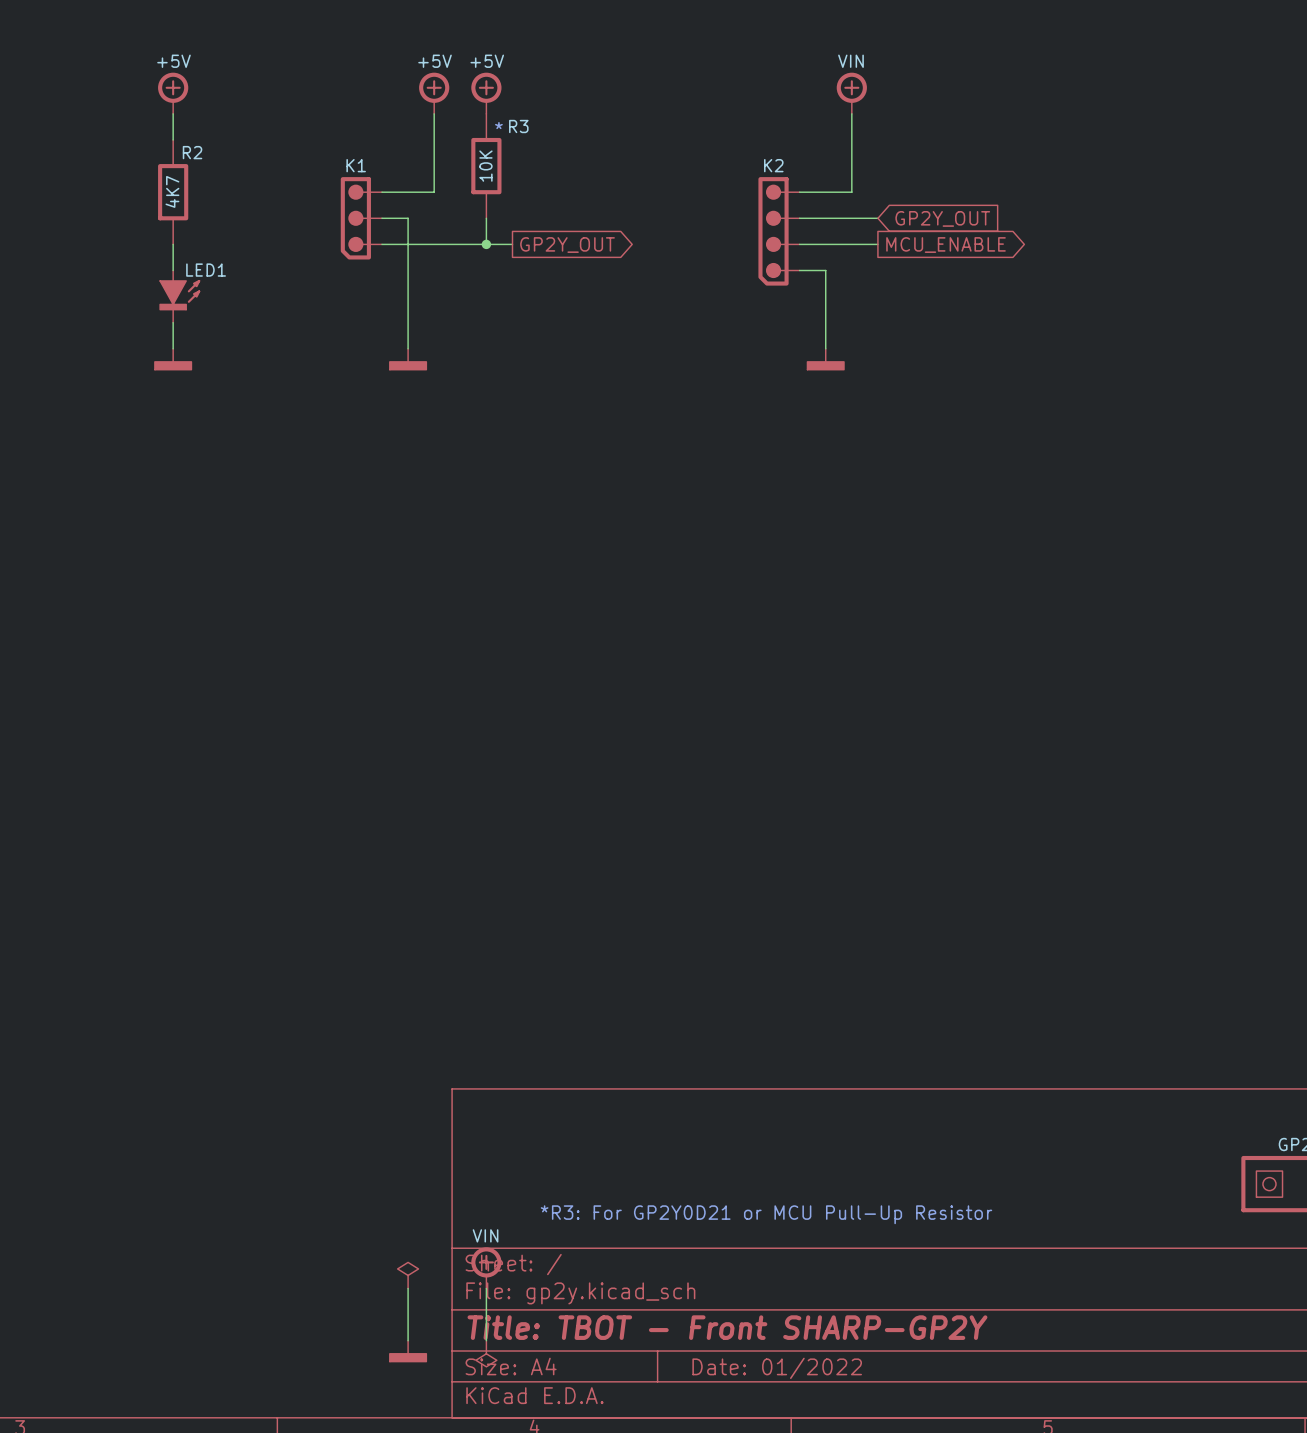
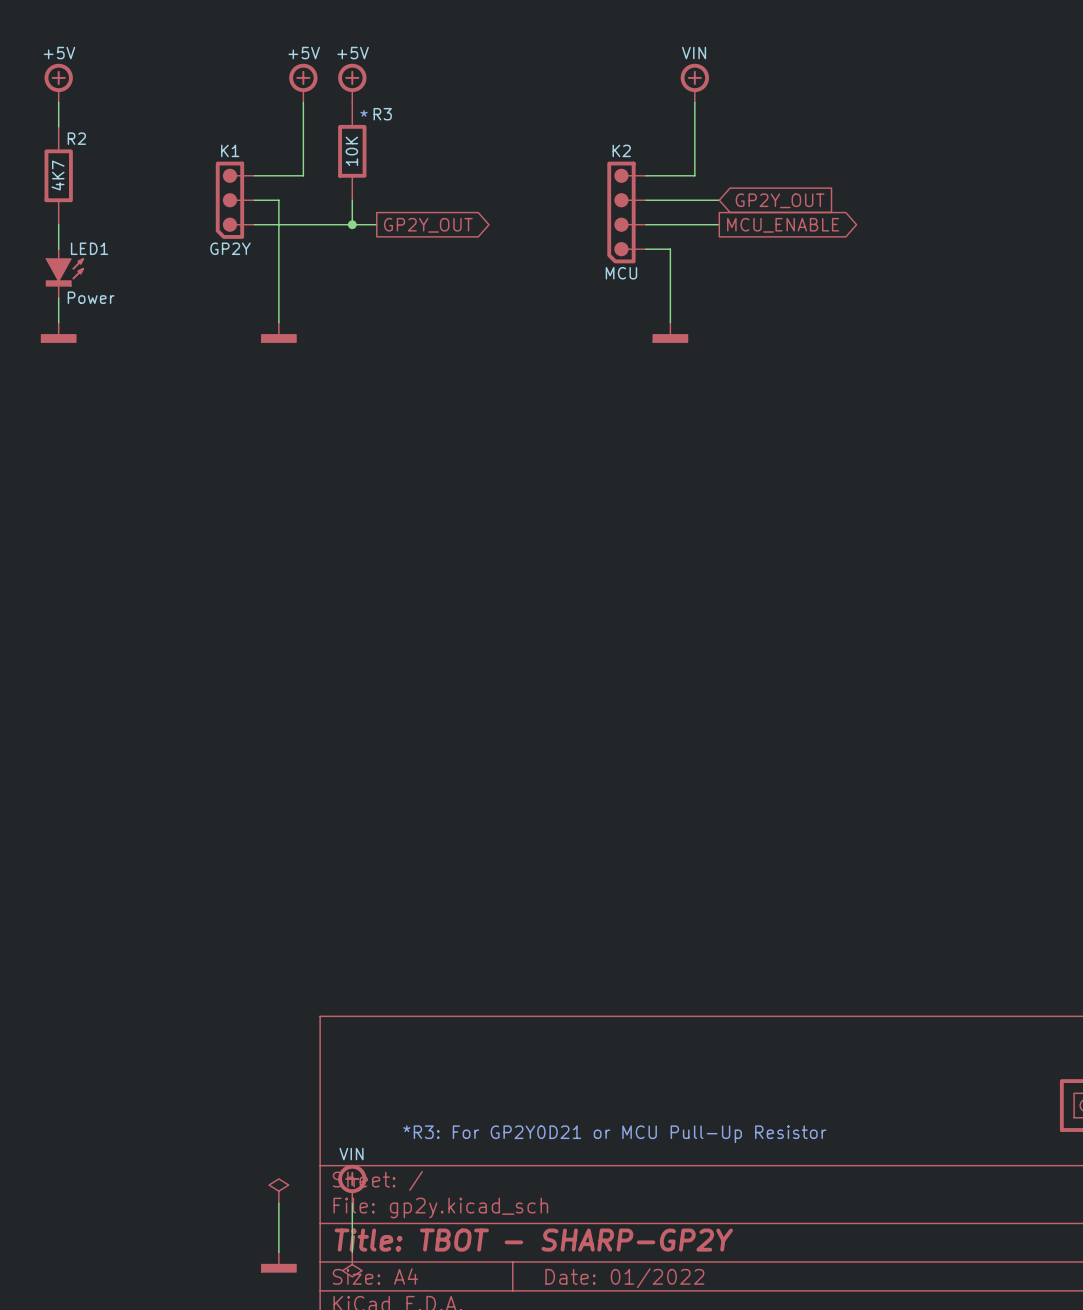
K1 value: none -> GP2Y (230, 248)
K2 value: none -> MCU (621, 273)
LED1 value: none -> Power (91, 297)
title block: Title: TBOT - Front SHARP-GP2Y (727, 1327) -> Title: TBOT - SHARP-GP2Y (533, 1240)

